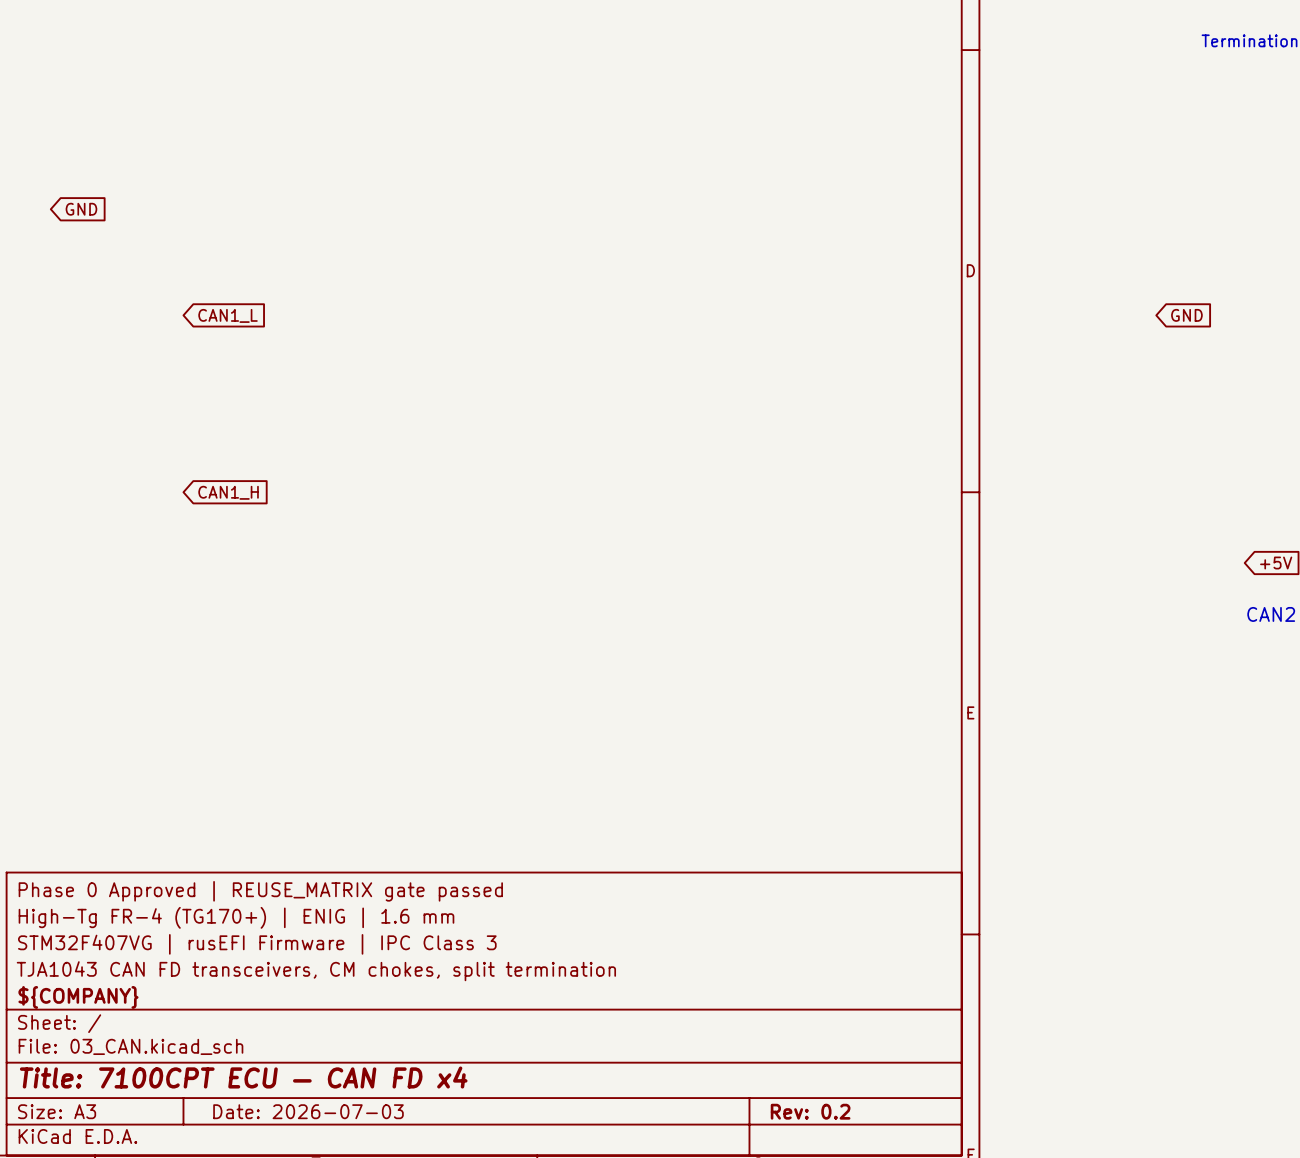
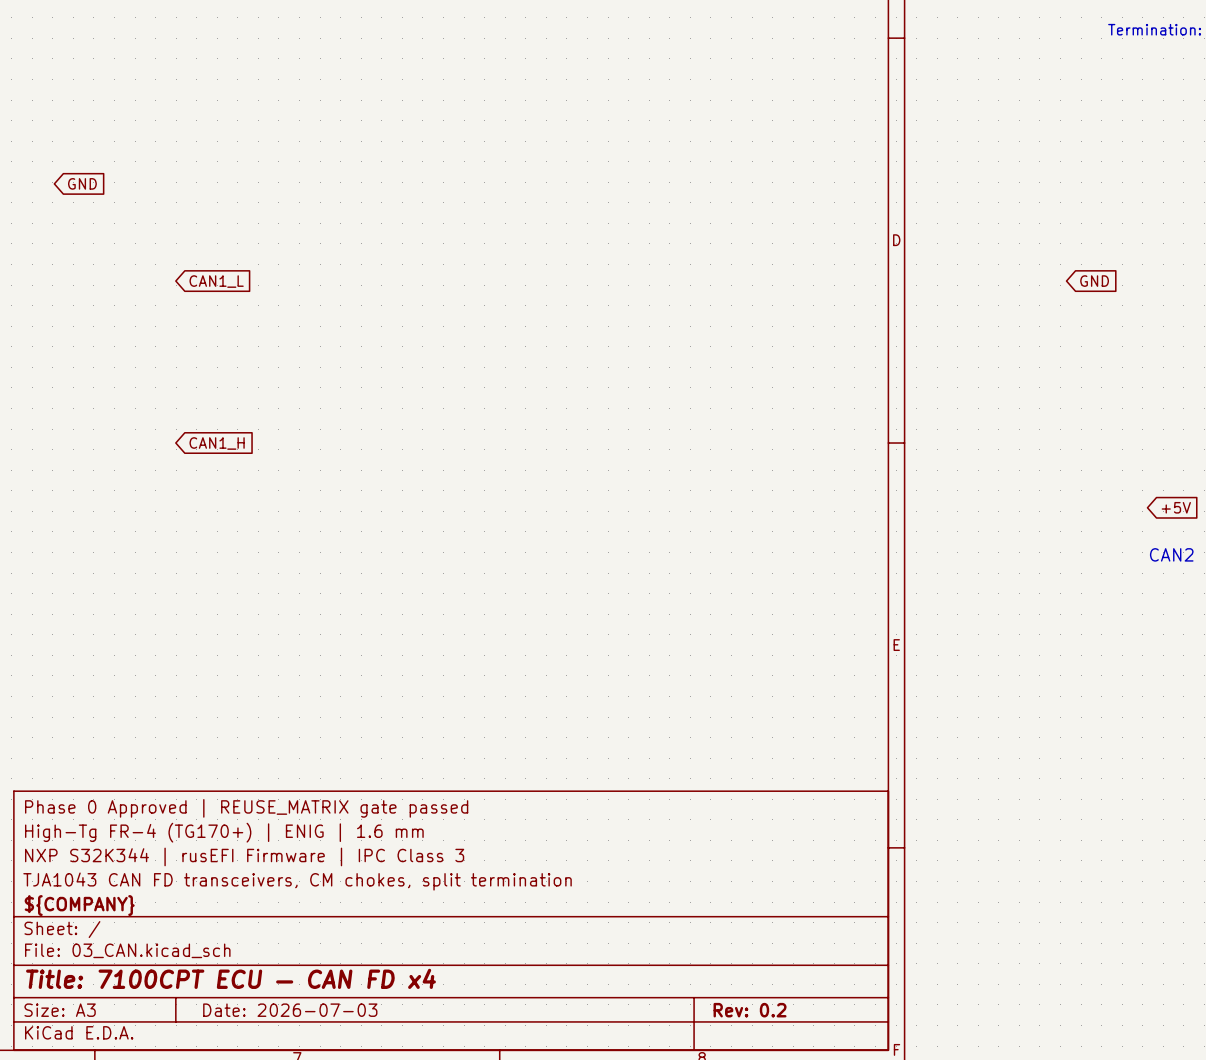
title block: STM32F407VG | rusEFI Firmware | IPC Class 3 (257, 944) -> NXP S32K344 | rusEFI Firmware | IPC Class 3 (244, 856)

